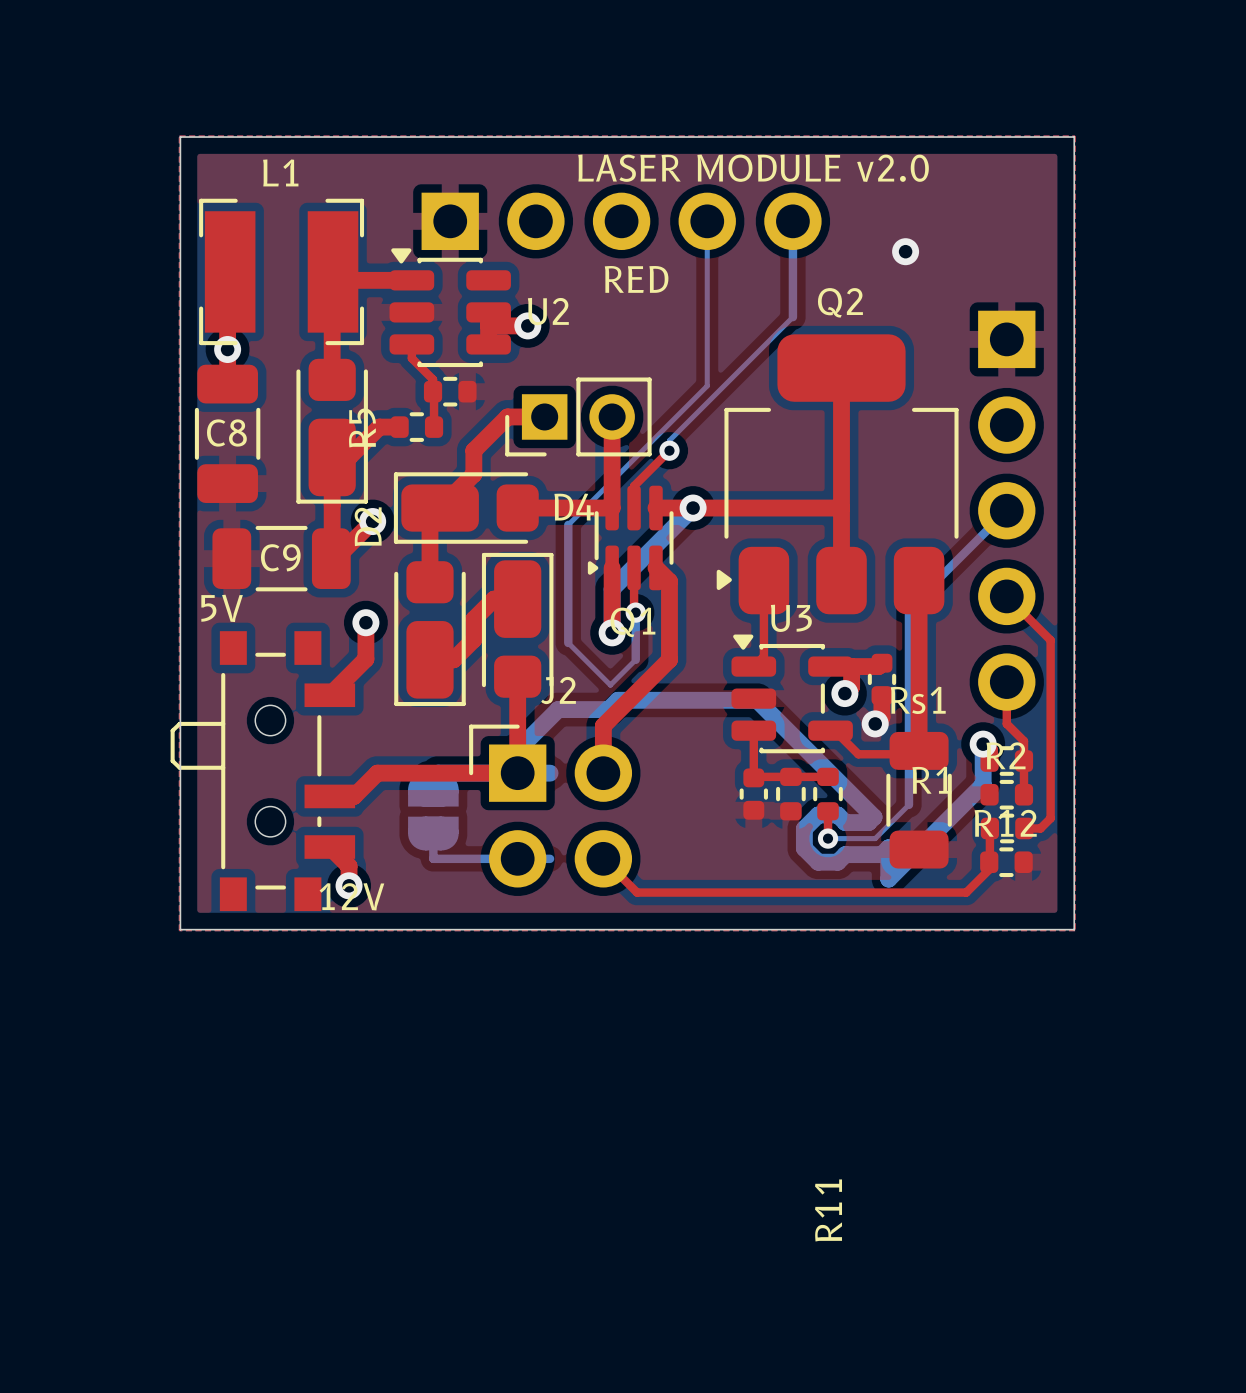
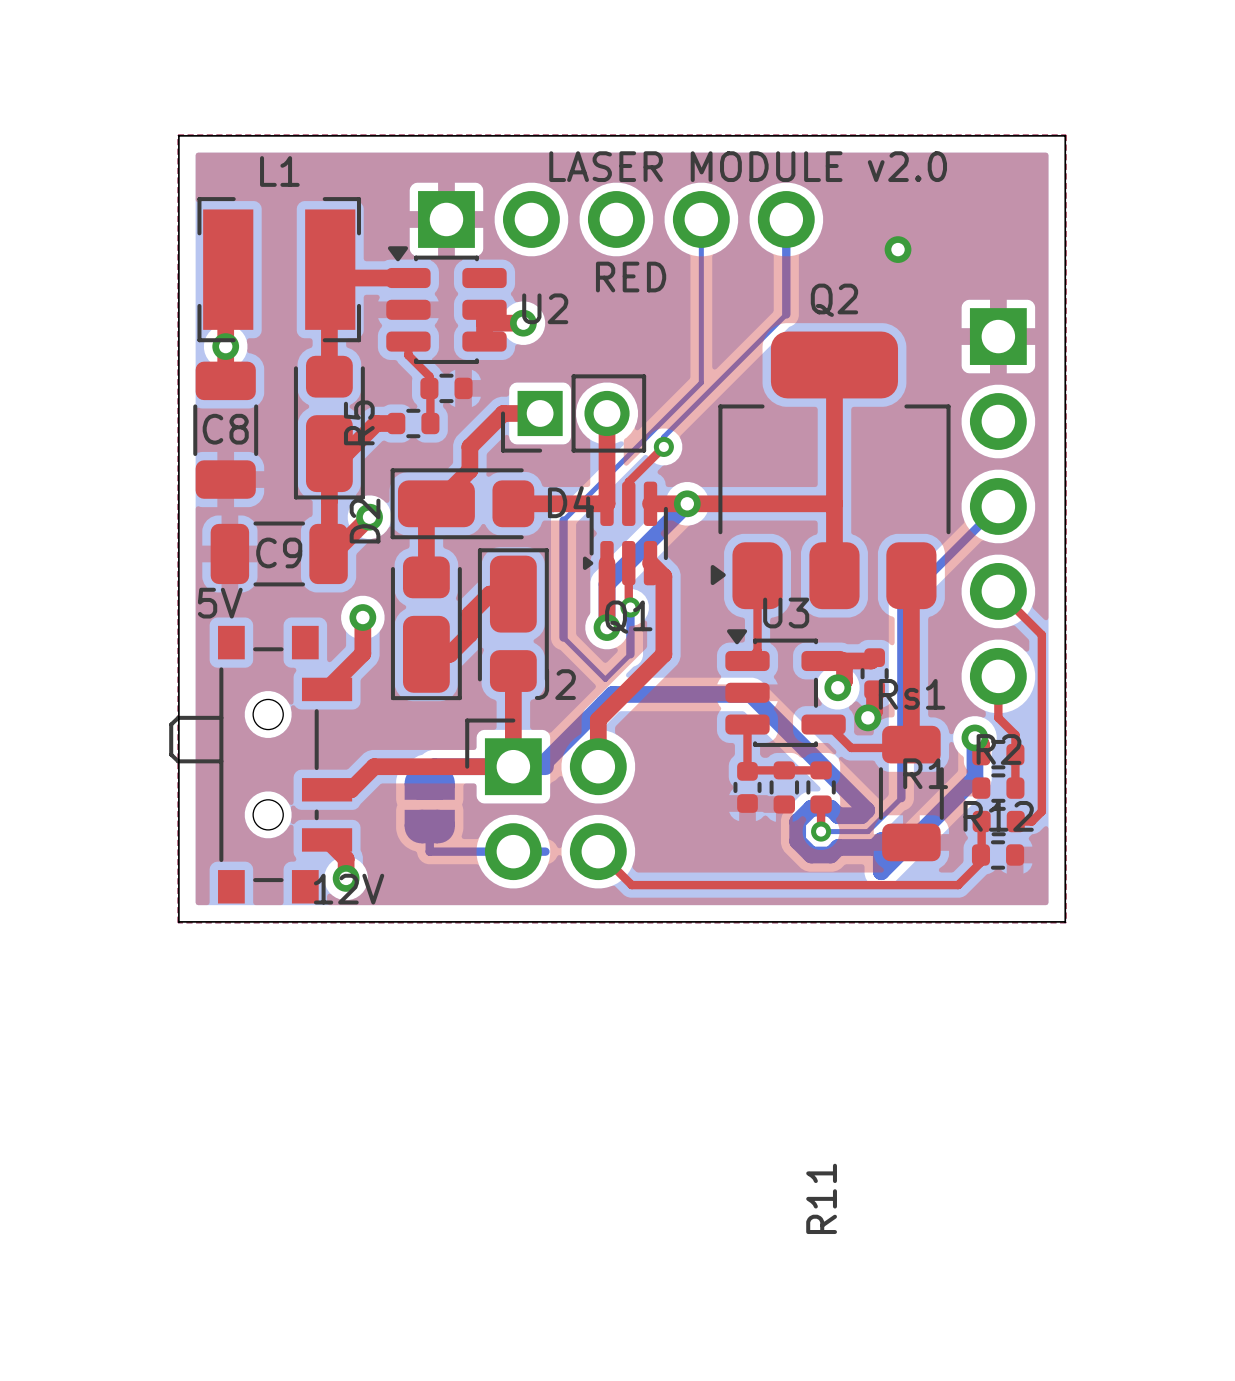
bottom track: (608, 709) (558, 709) (494, 773) -> (603, 703) (540, 766)

